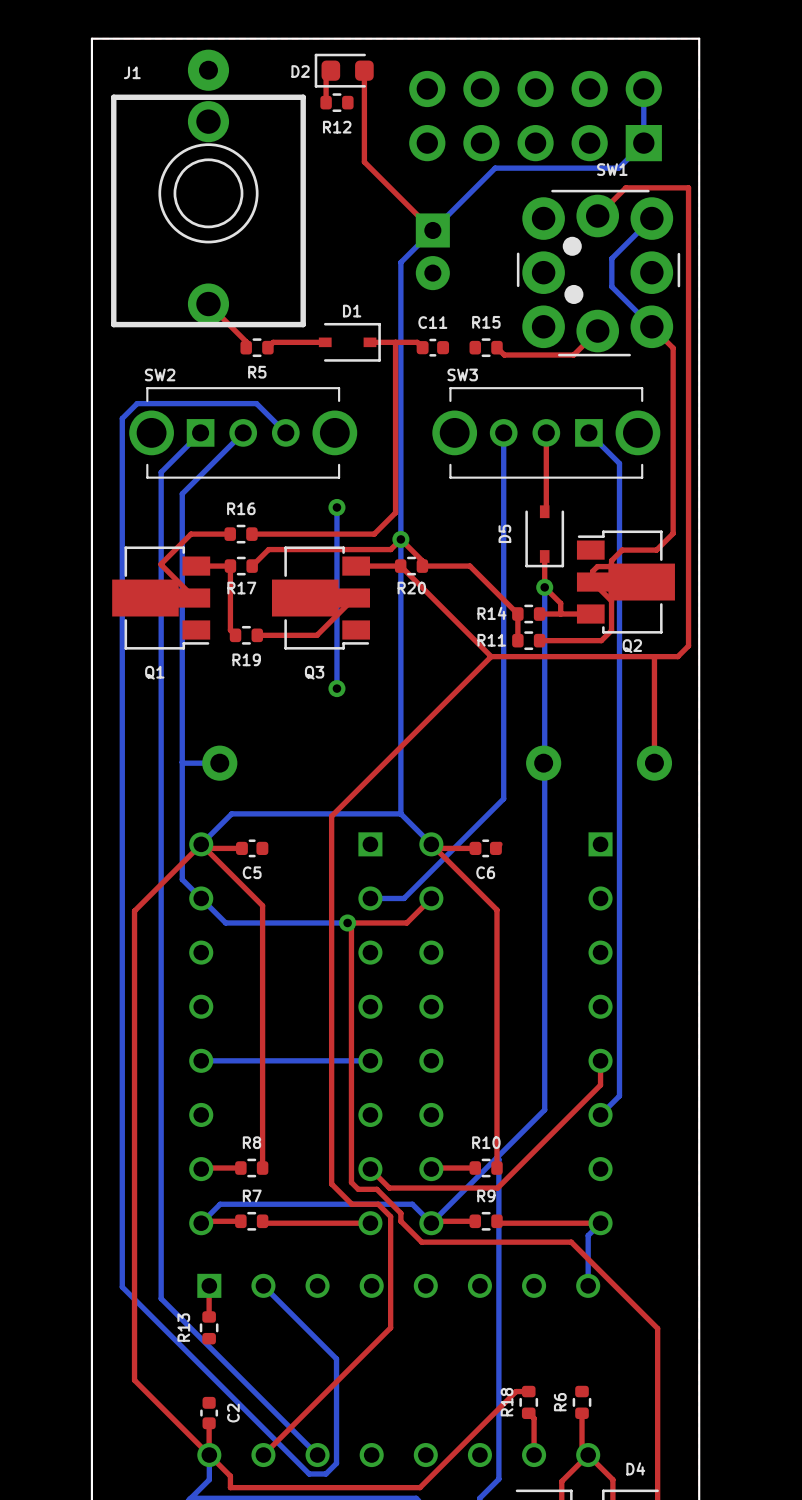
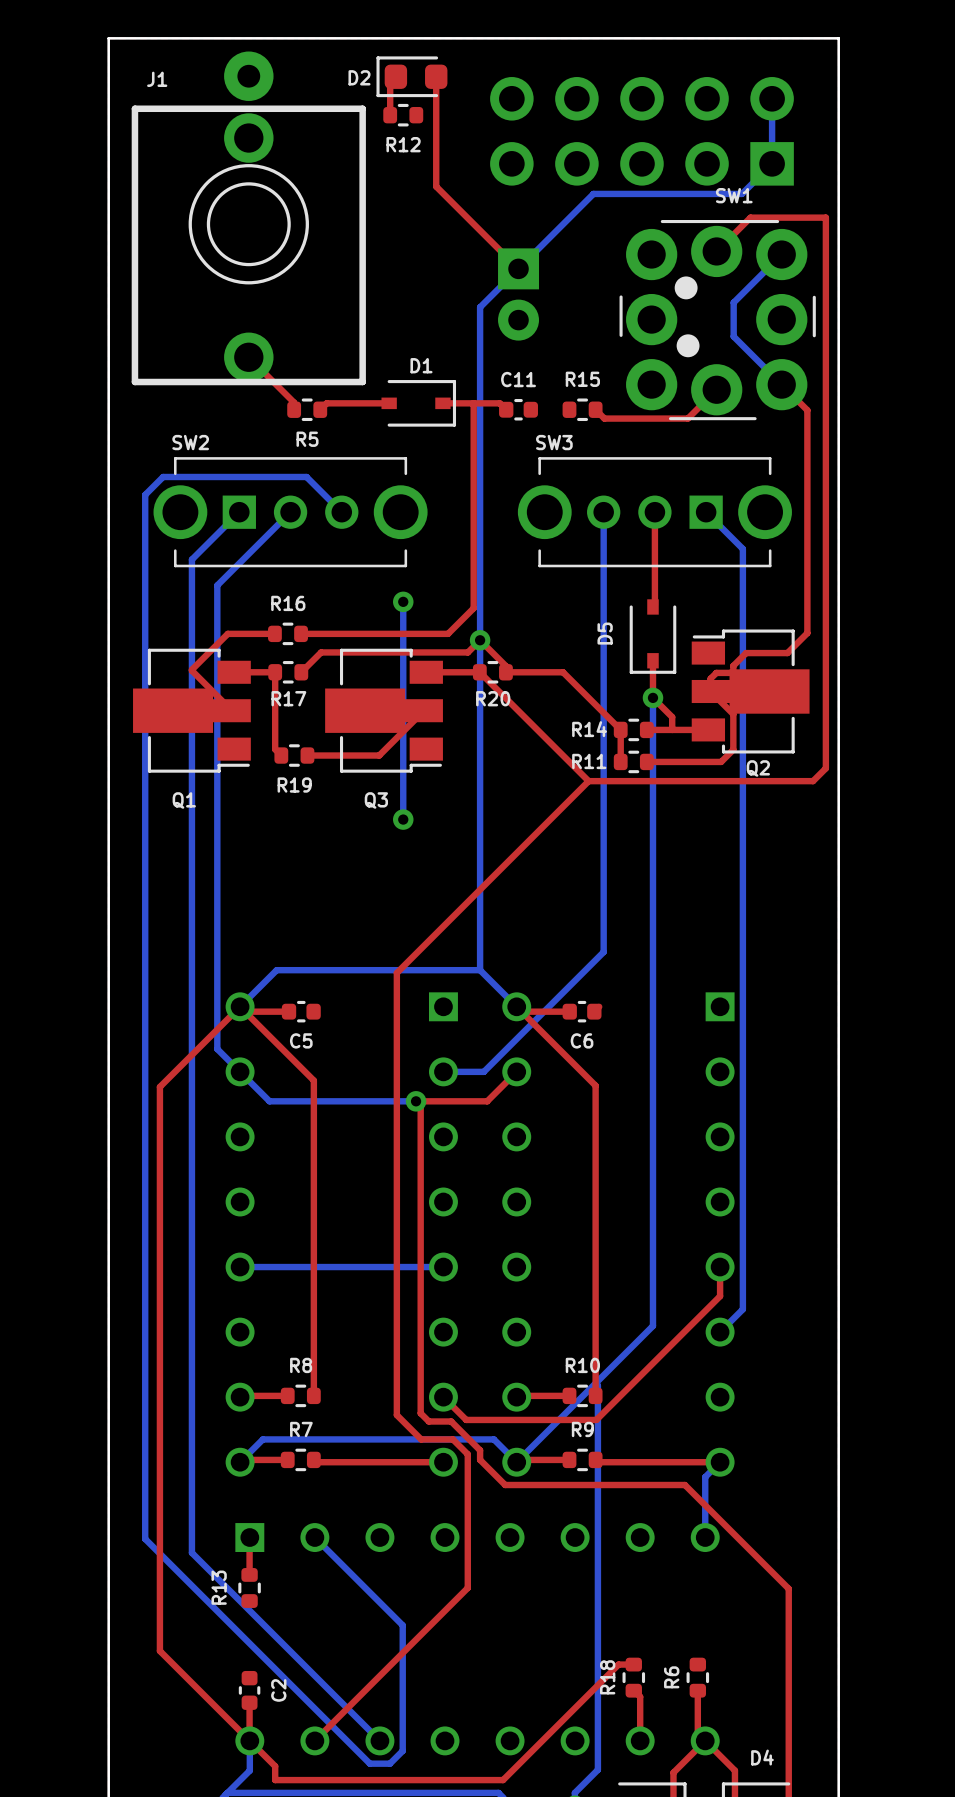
top track: (654, 656) (654, 763) -> none
bottom track: (182, 762) (219, 763) -> none
part: (219, 763) -> none
part: (543, 763) -> none
part: (654, 763) -> none

